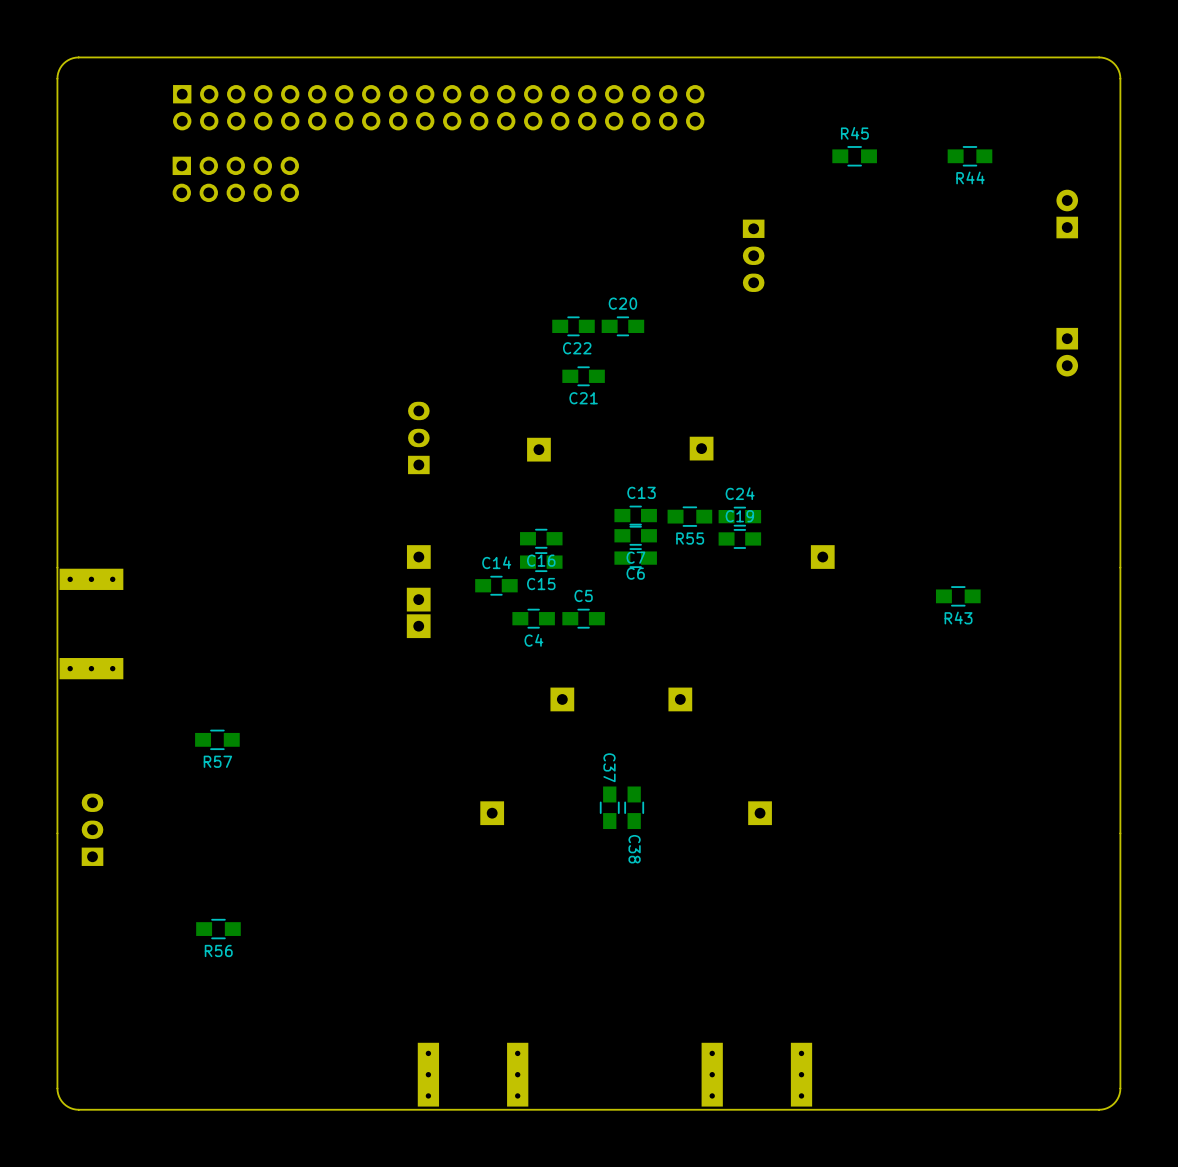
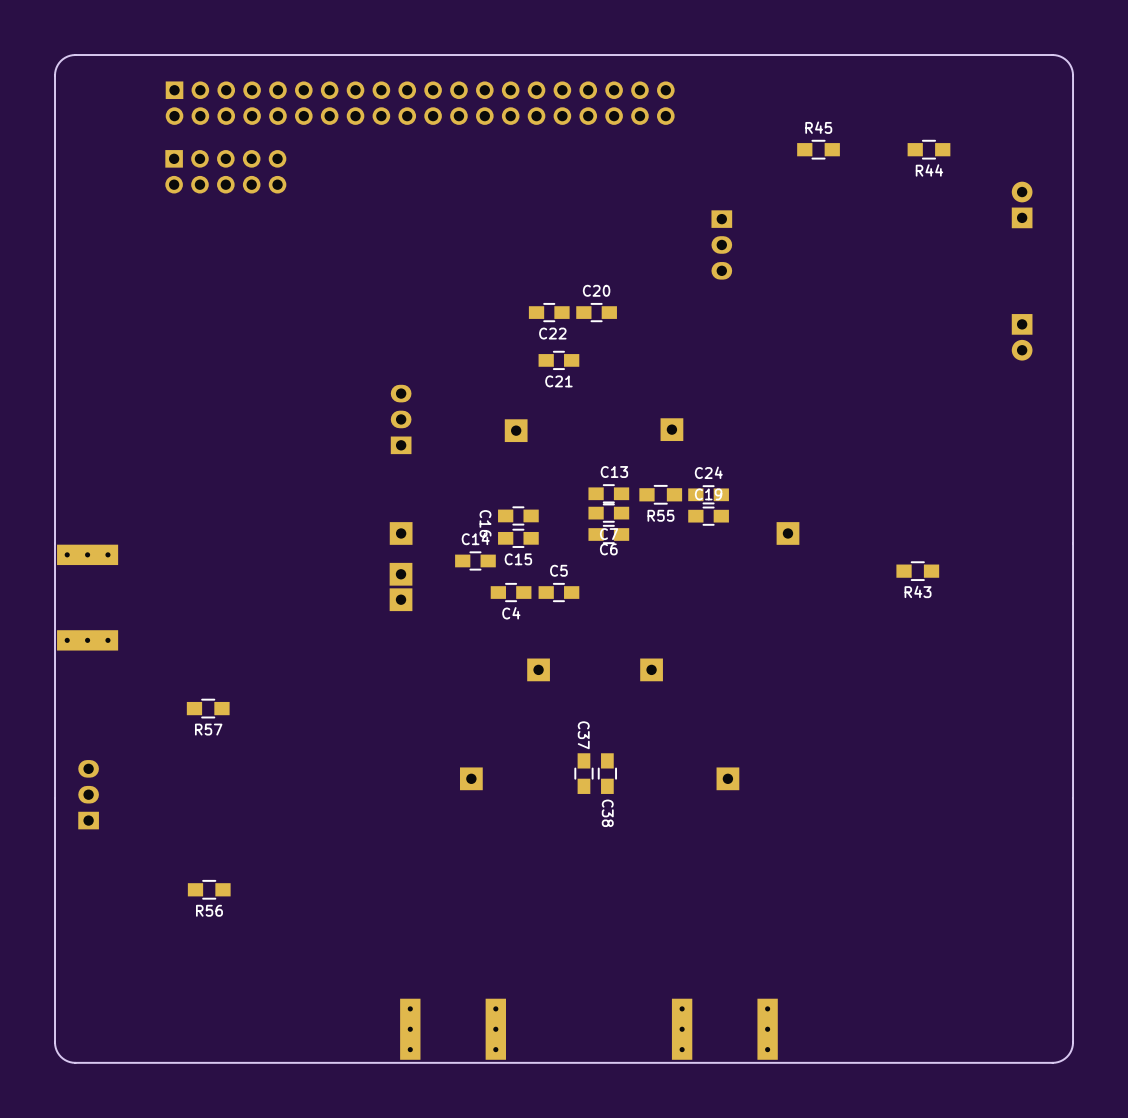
C16 name rotation: 0° (541, 560) -> 90° clockwise (485, 523)
C16 name position: C16 (541, 560) -> C16 (485, 523)

